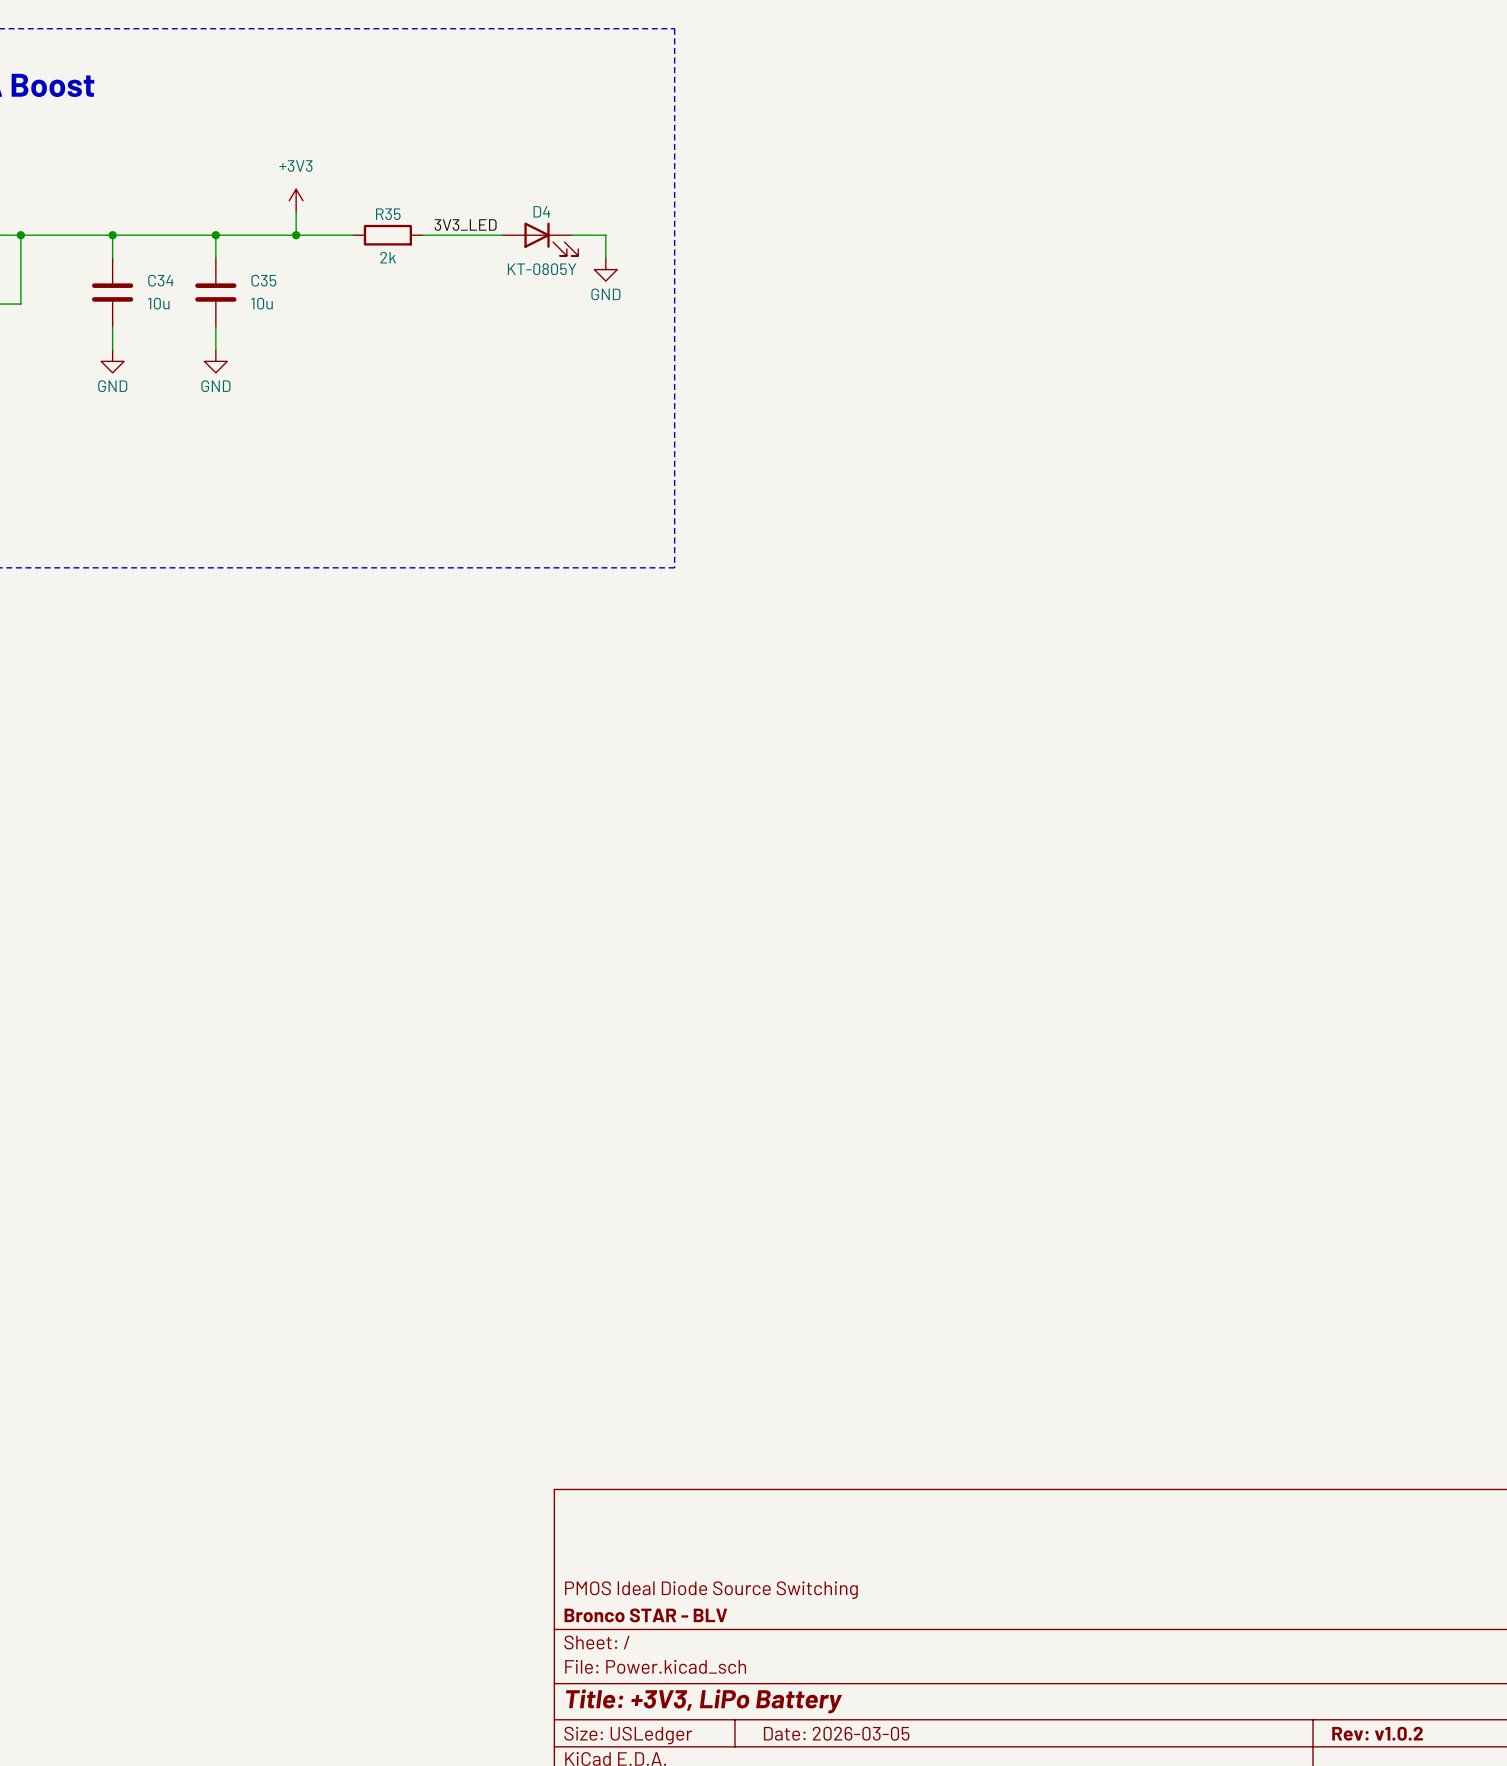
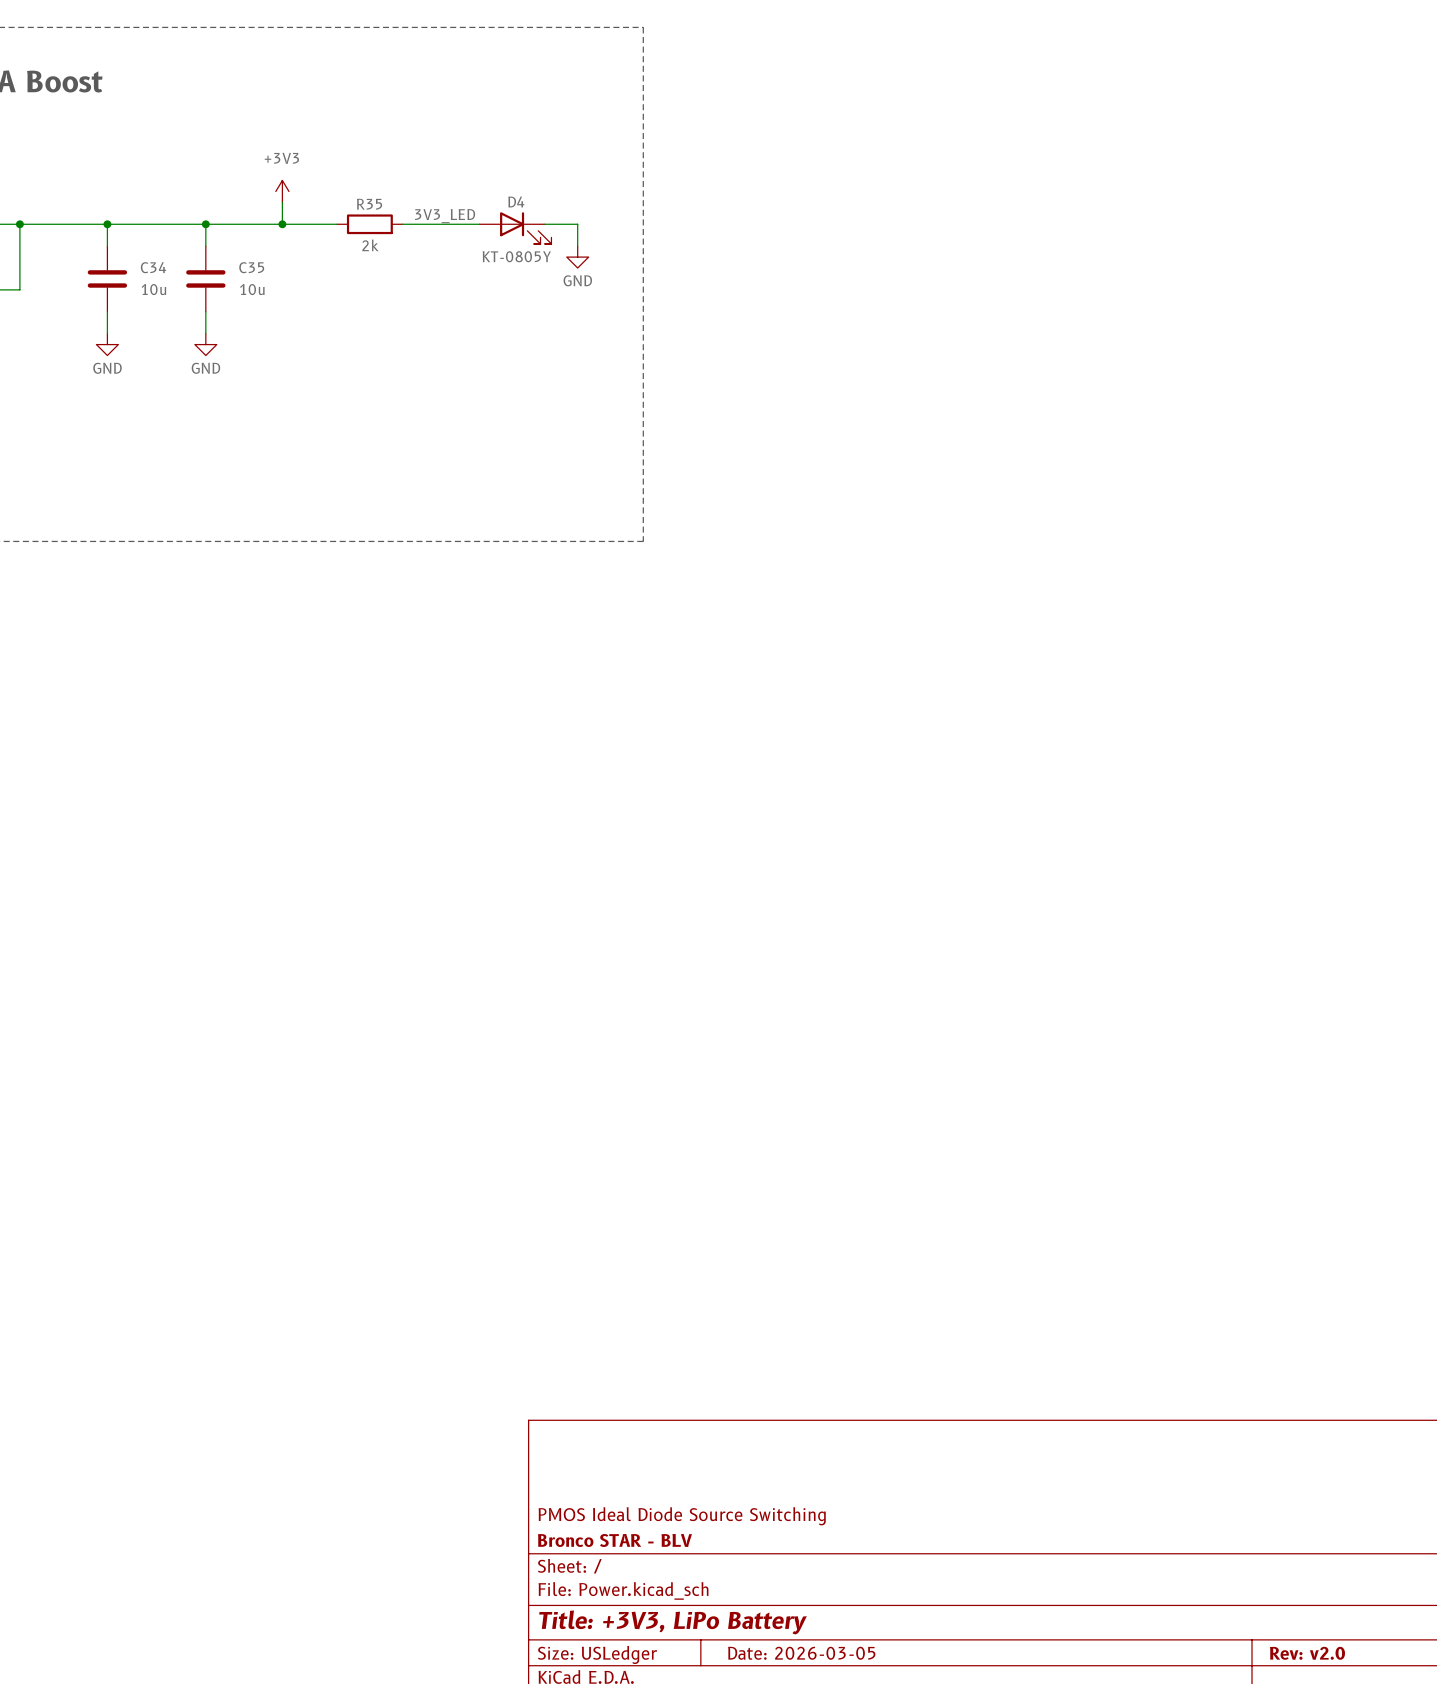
title block: Rev: v1.0.2 (1377, 1733) -> Rev: v2.0 (1307, 1653)

